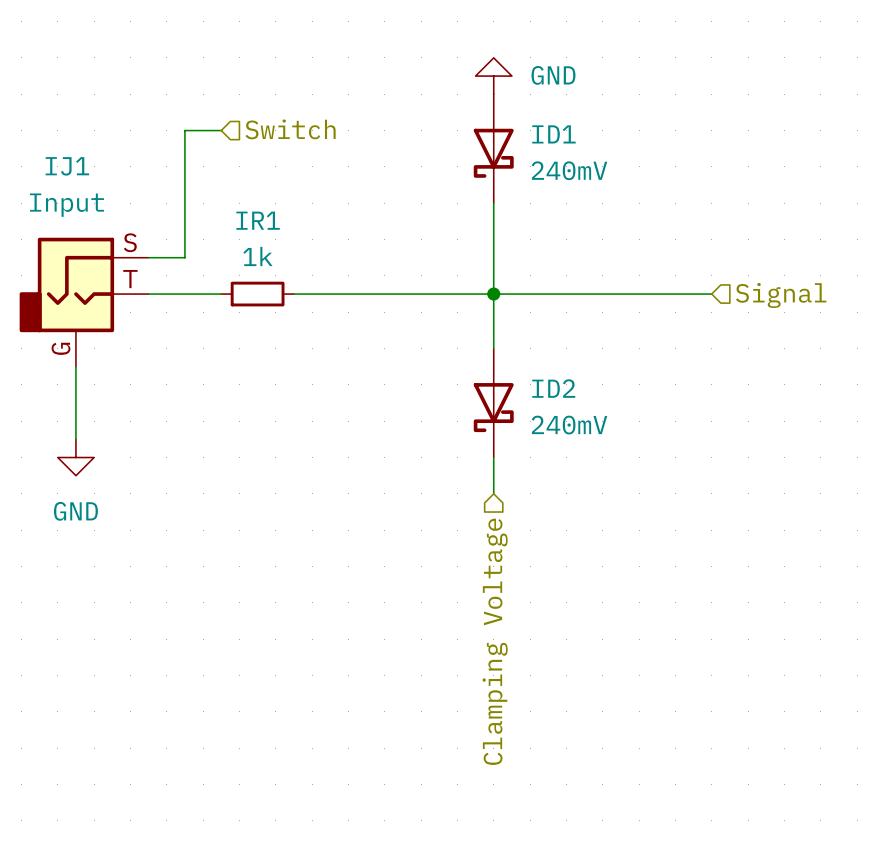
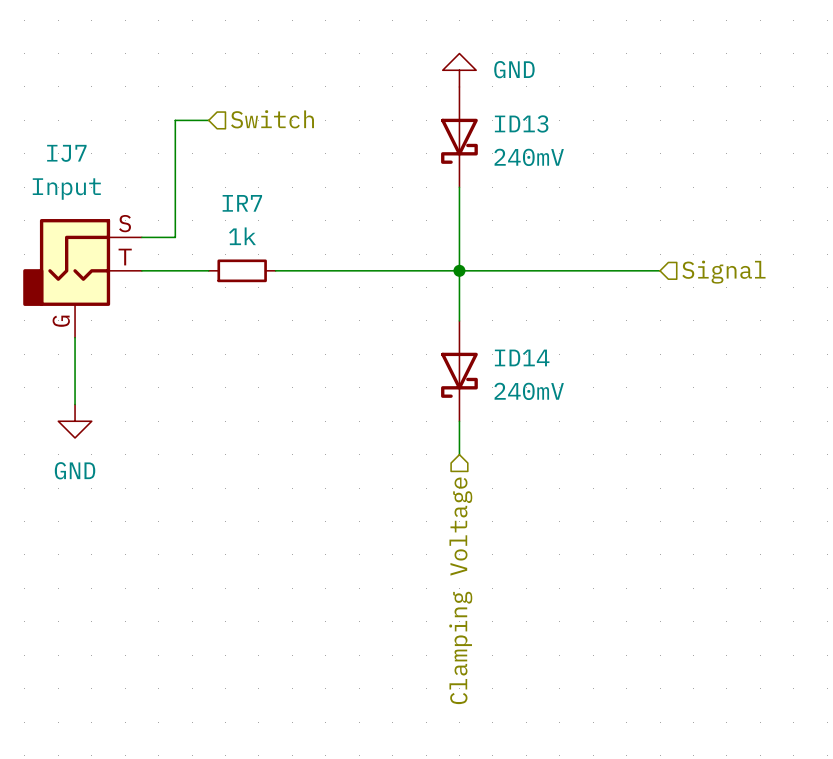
ID1 name: ID1 (553, 134) -> ID13 (521, 123)
IJ1 name: IJ1 (67, 166) -> IJ7 (66, 153)
IR1 name: IR1 (258, 220) -> IR7 (242, 203)
ID2 name: ID2 (553, 388) -> ID14 (522, 357)

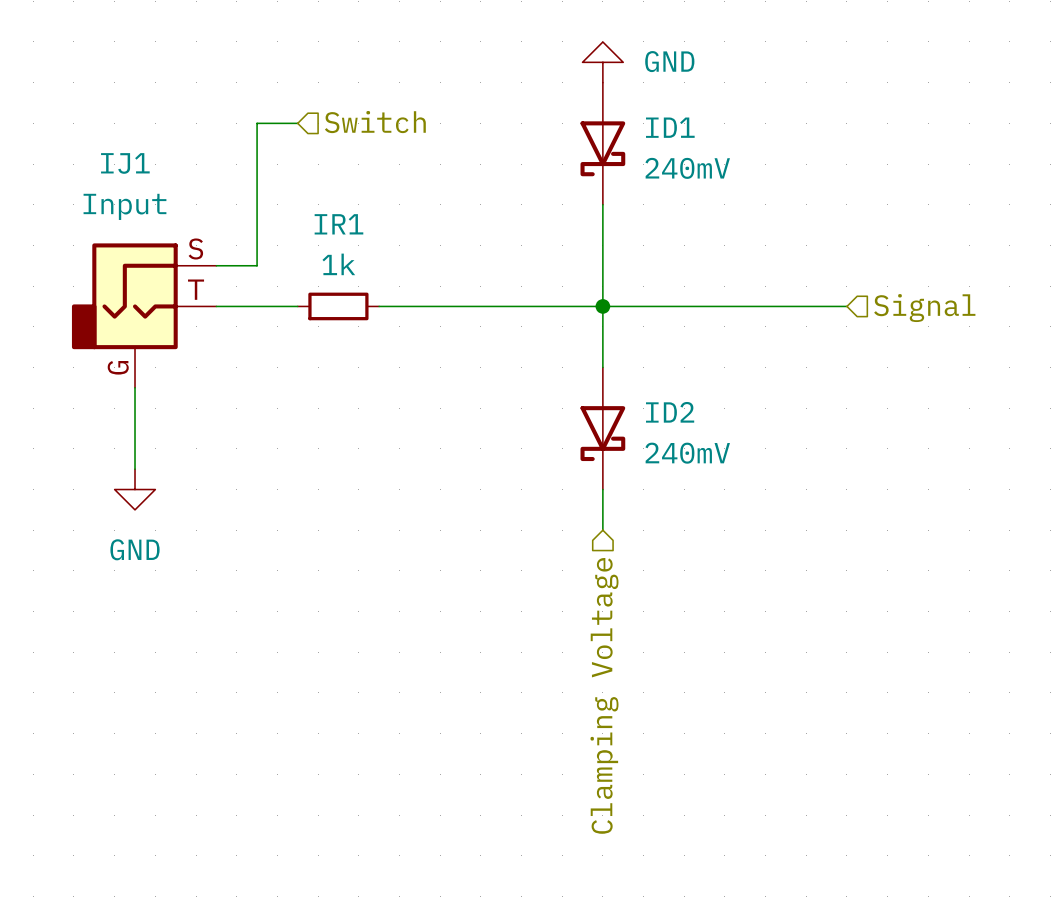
ID13 name: ID13 (521, 123) -> ID1 (670, 127)
IJ7 name: IJ7 (66, 153) -> IJ1 (125, 163)
IR7 name: IR7 (242, 203) -> IR1 (338, 224)
ID14 name: ID14 (522, 357) -> ID2 (670, 412)

